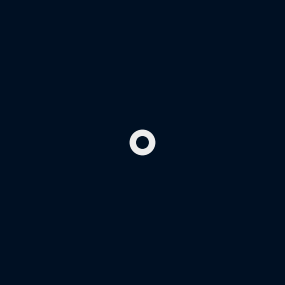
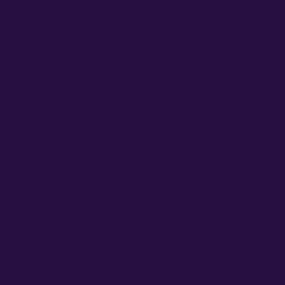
via: (142, 142) -> none

